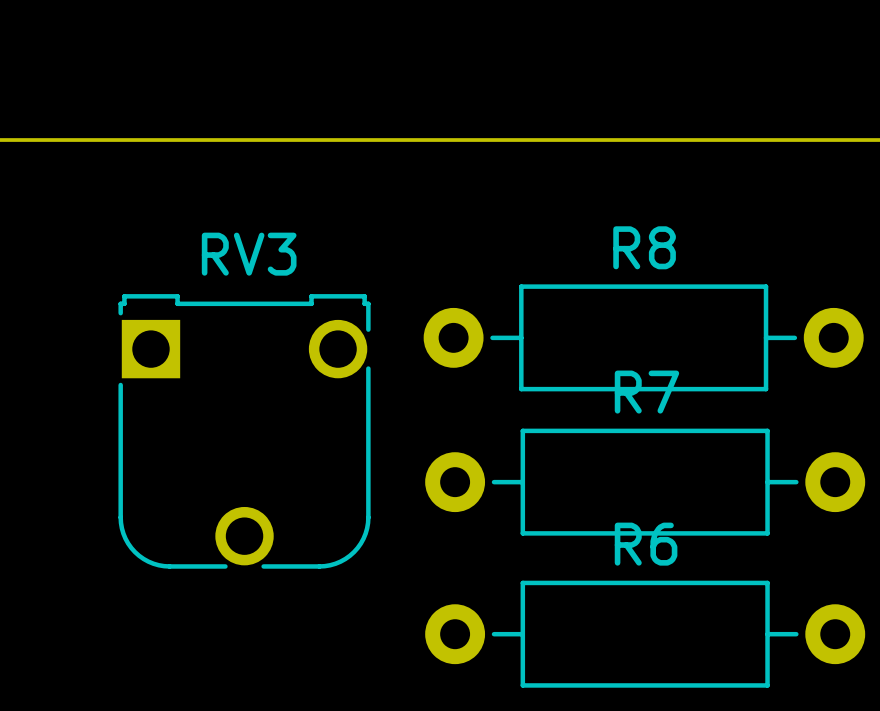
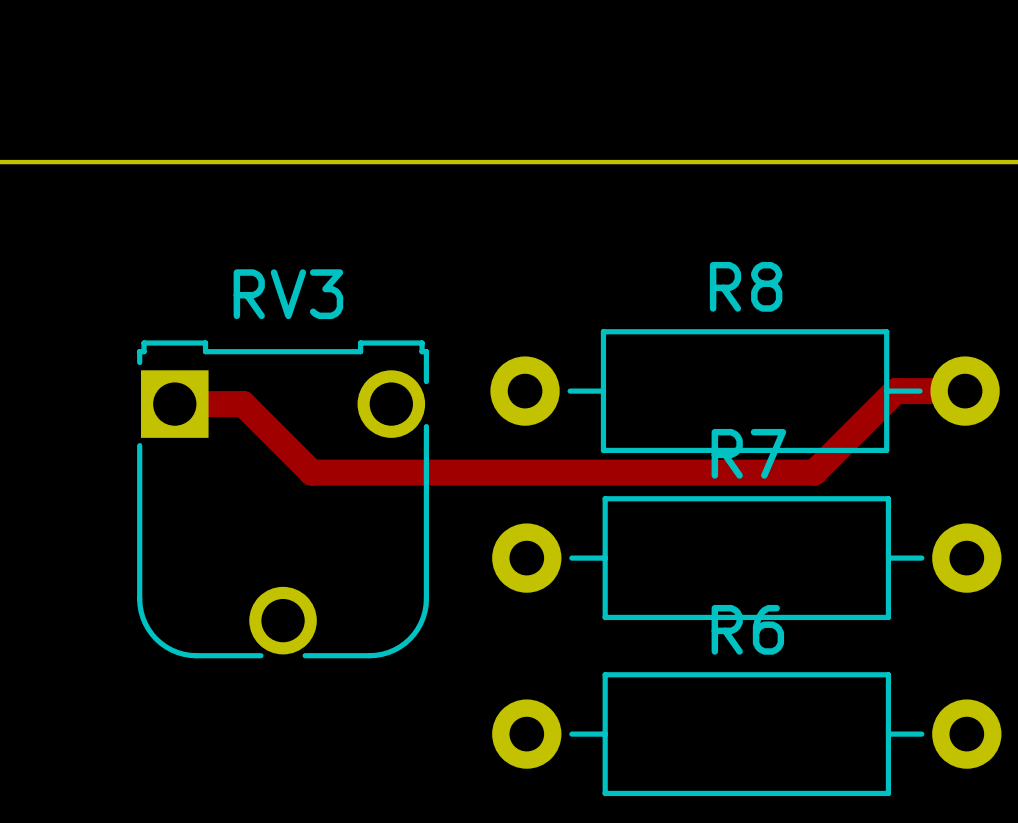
track: none -> (965, 391) (895, 391) (814, 472) (311, 472) (243, 404) (174, 404)

